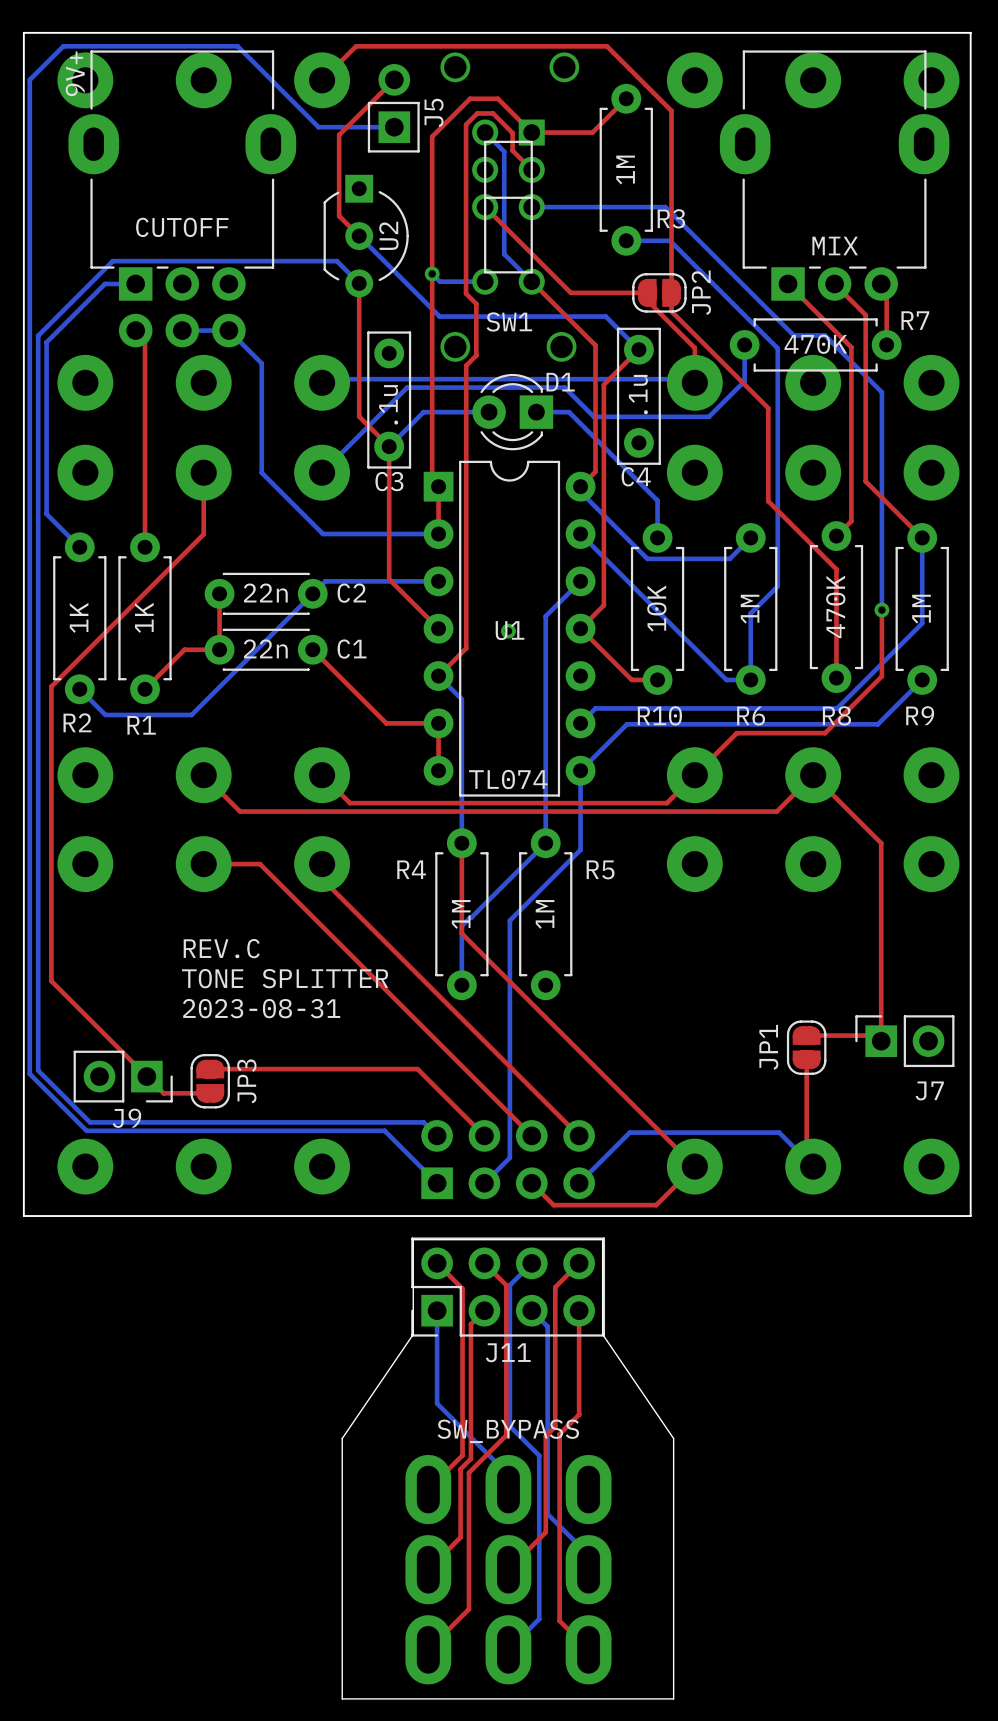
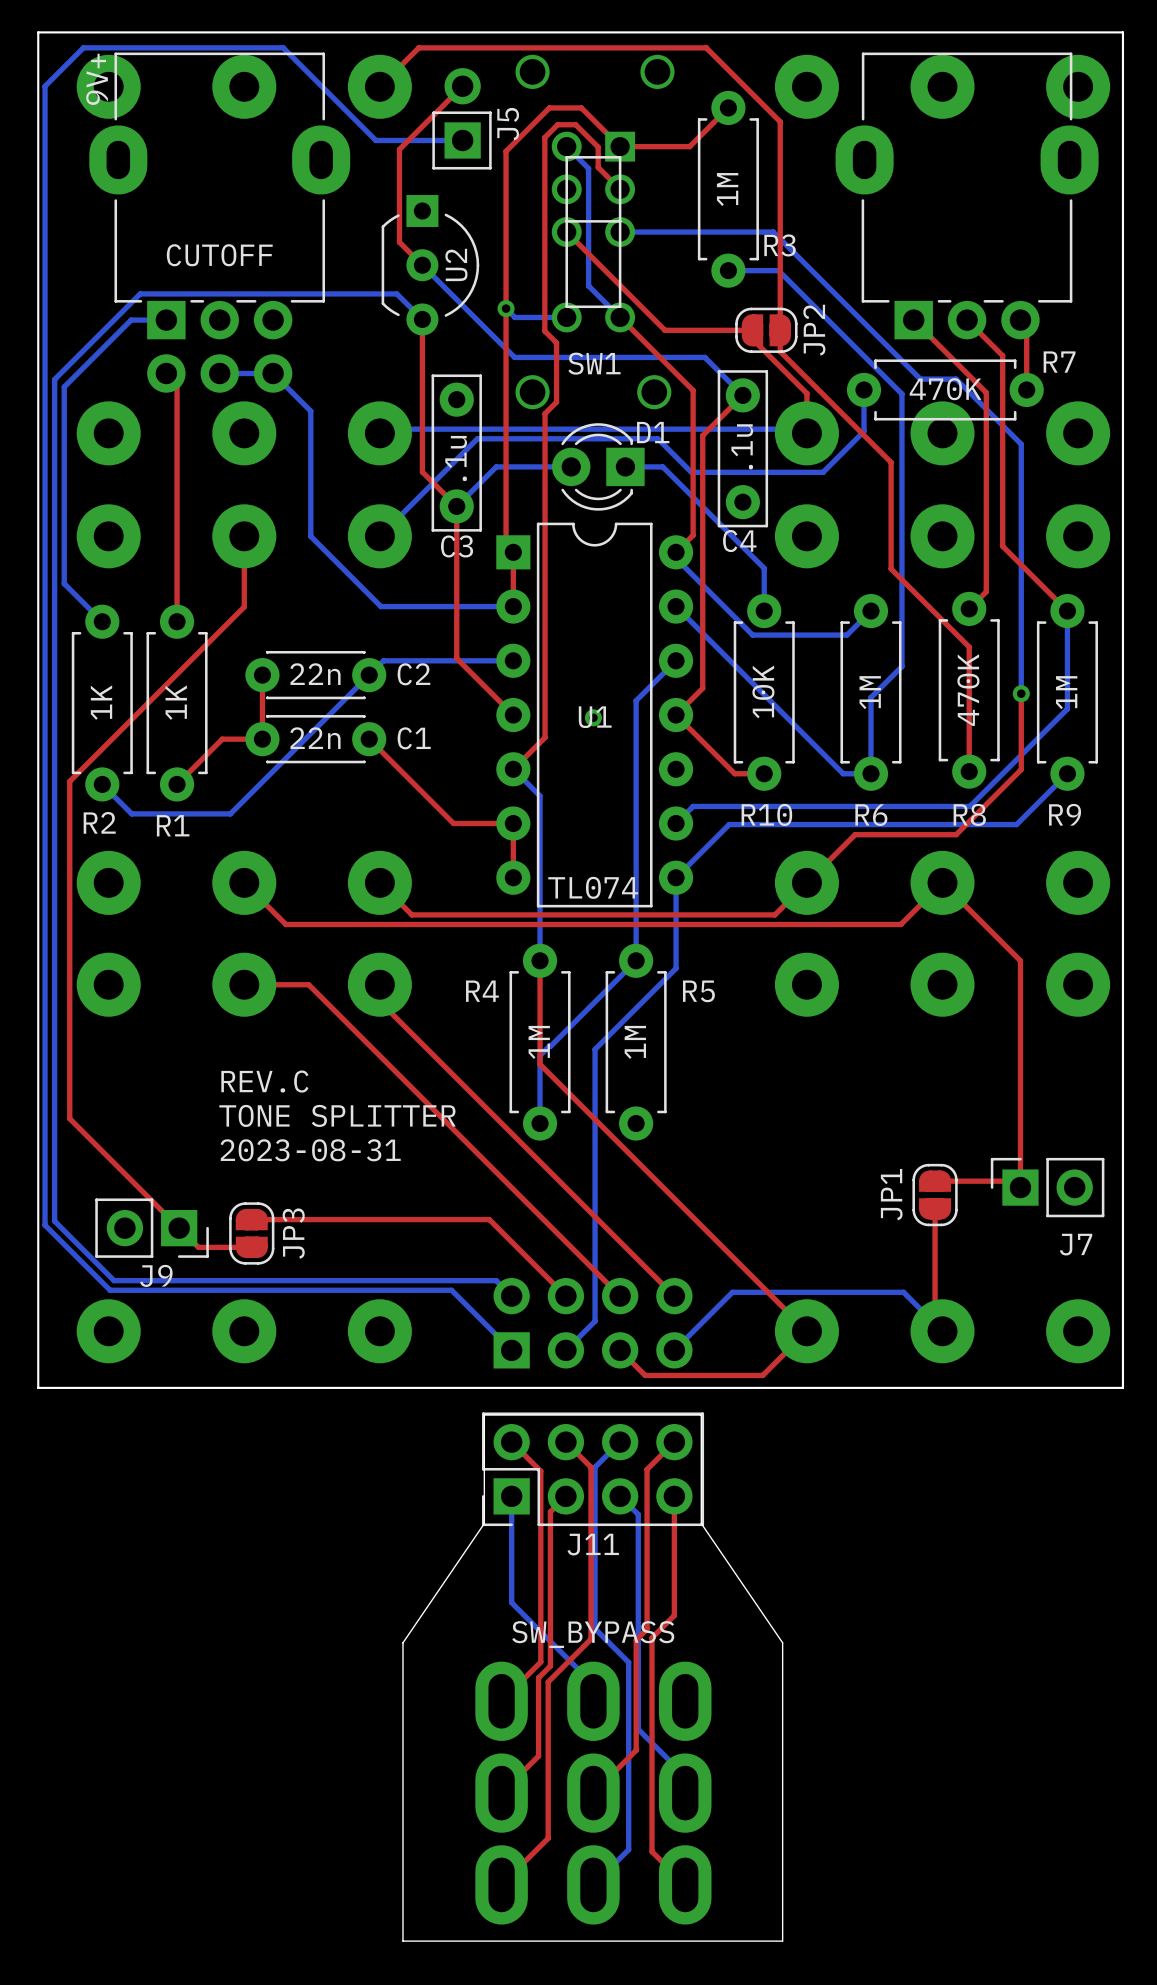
part value: MIX (835, 246) -> none

